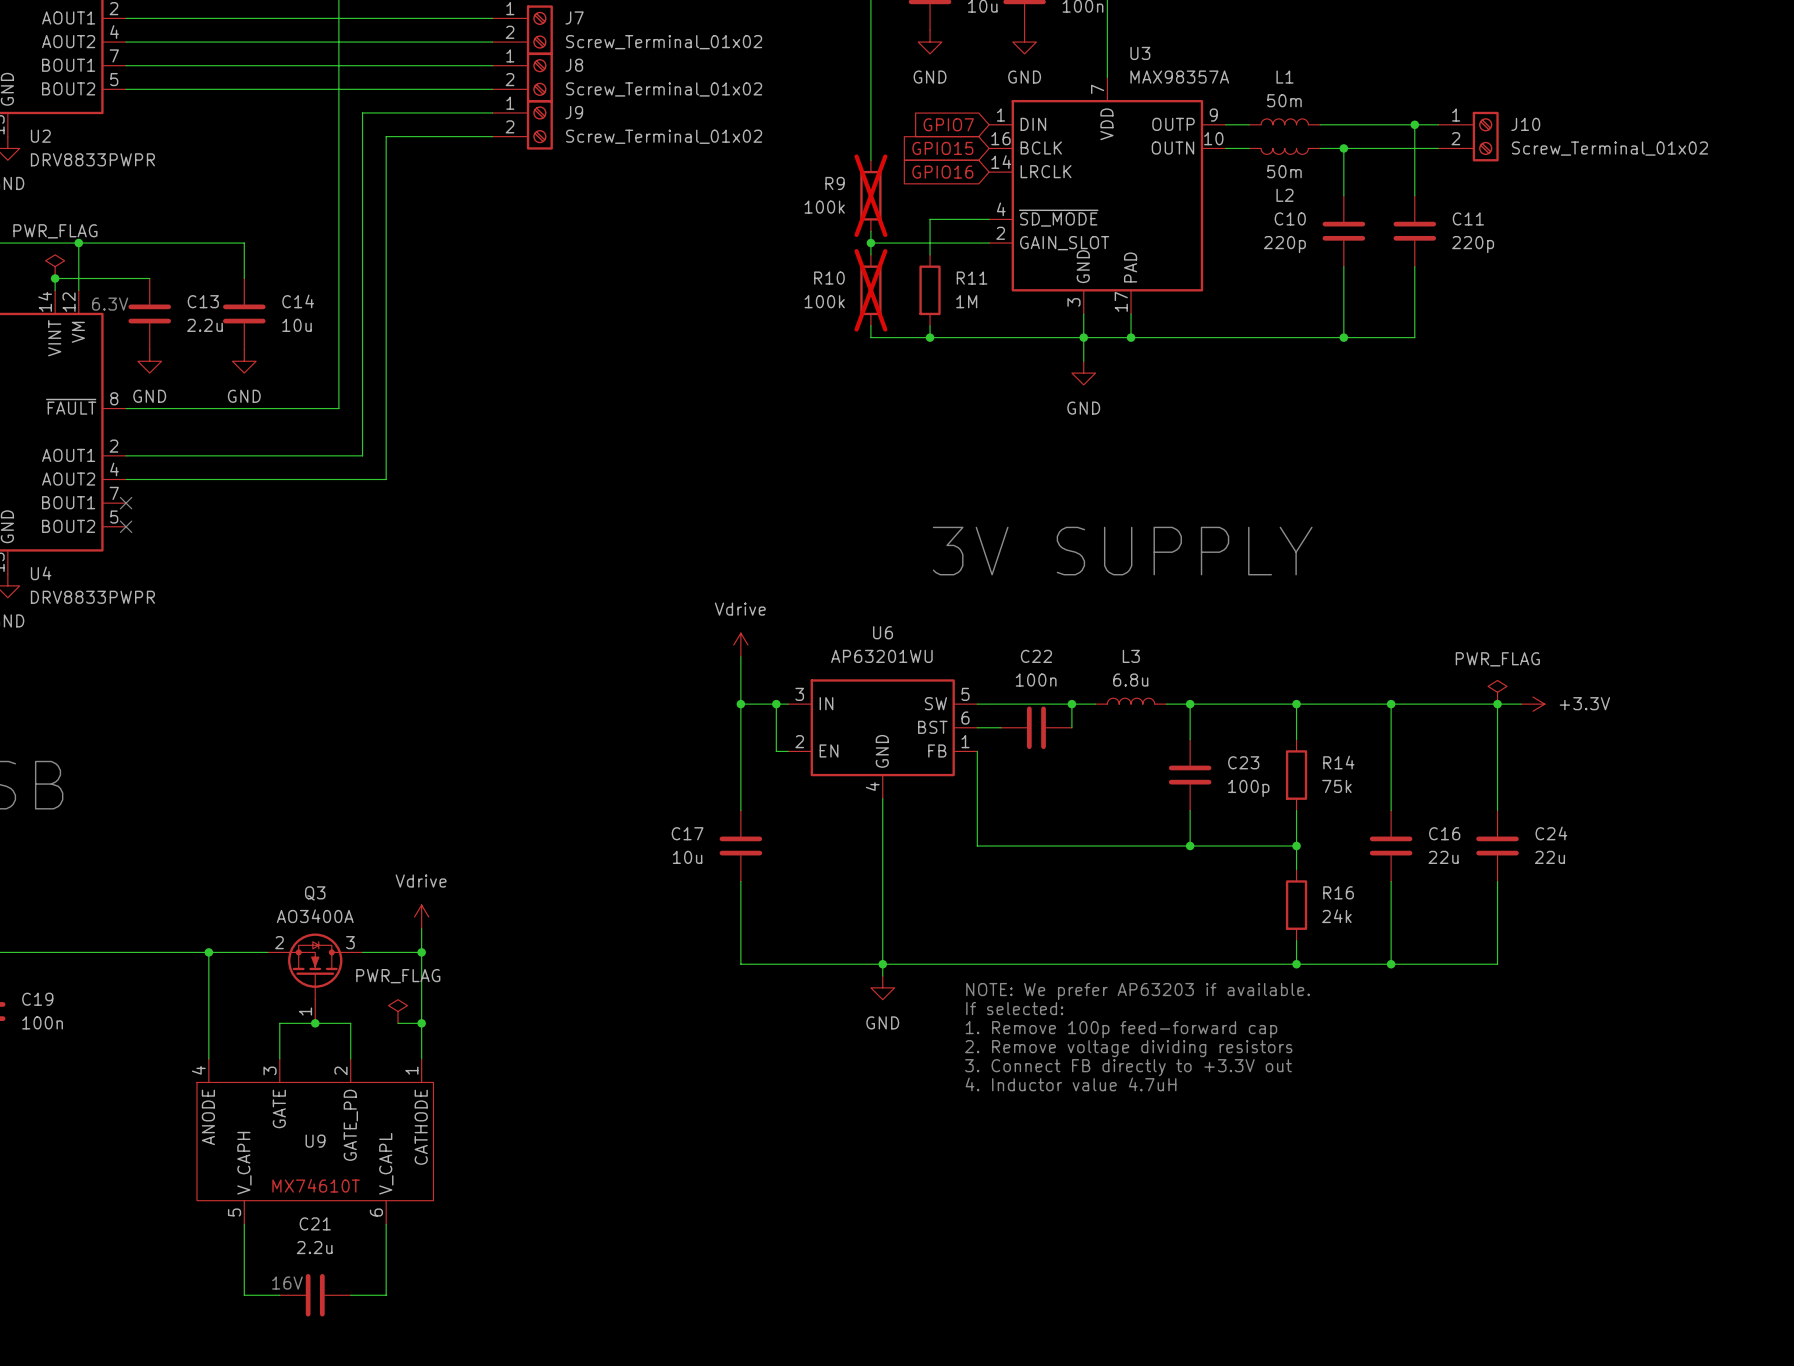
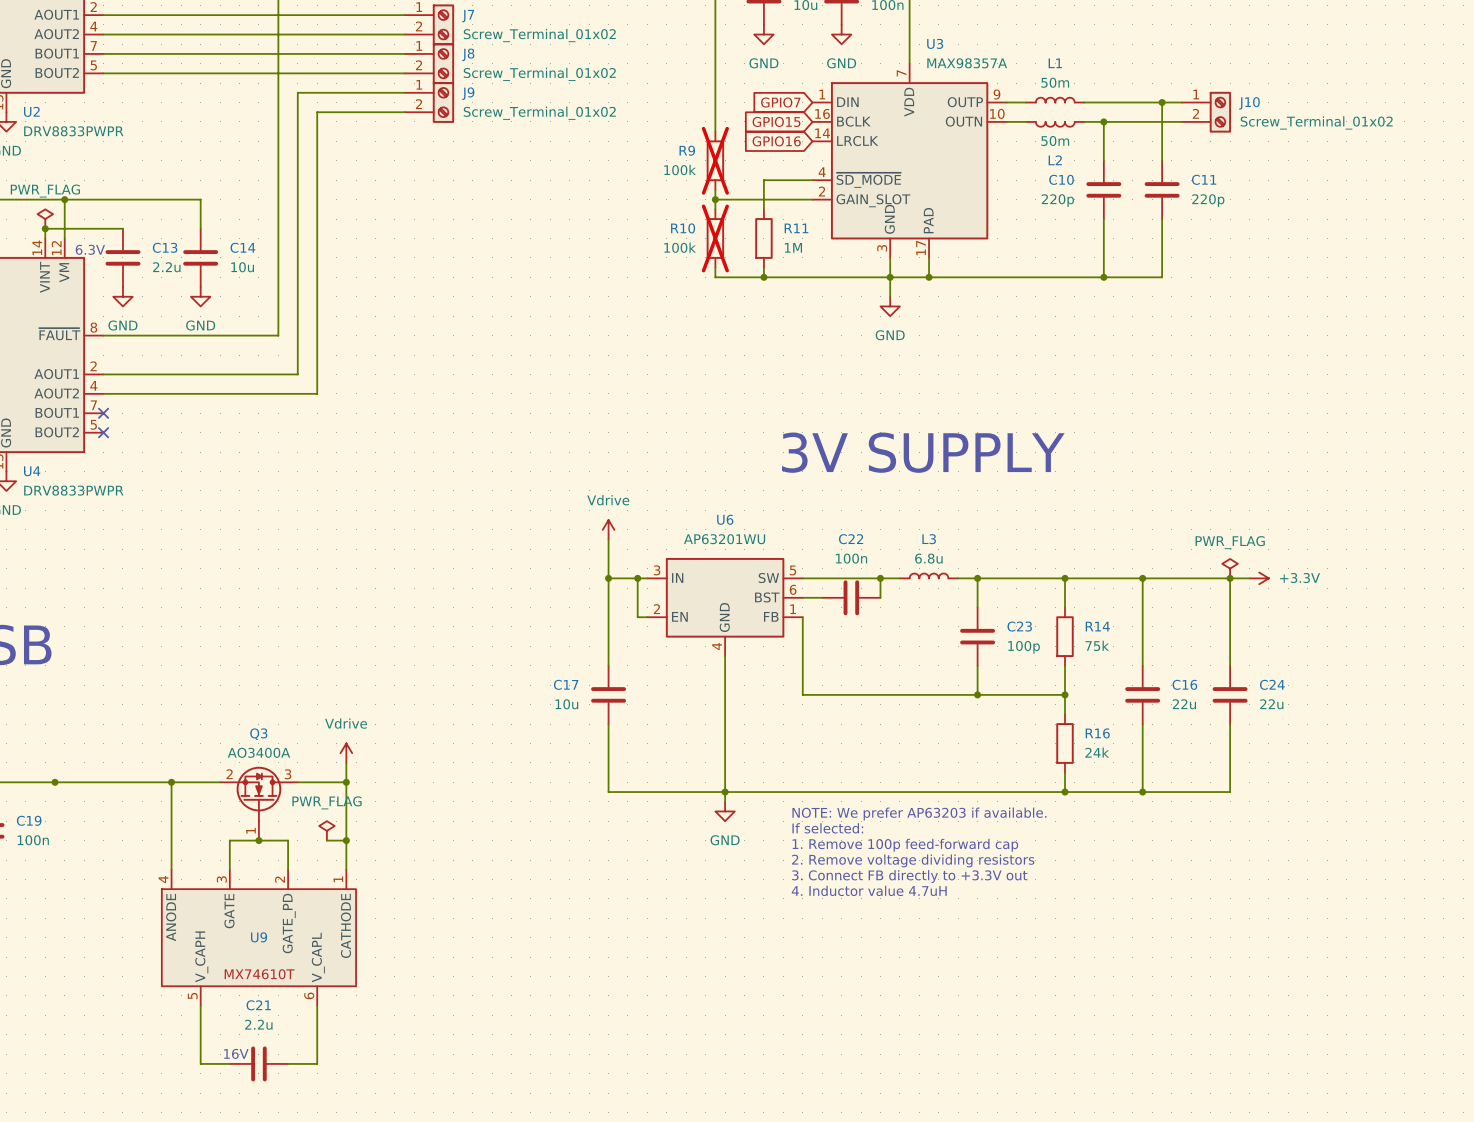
junction: none -> (55, 782)

